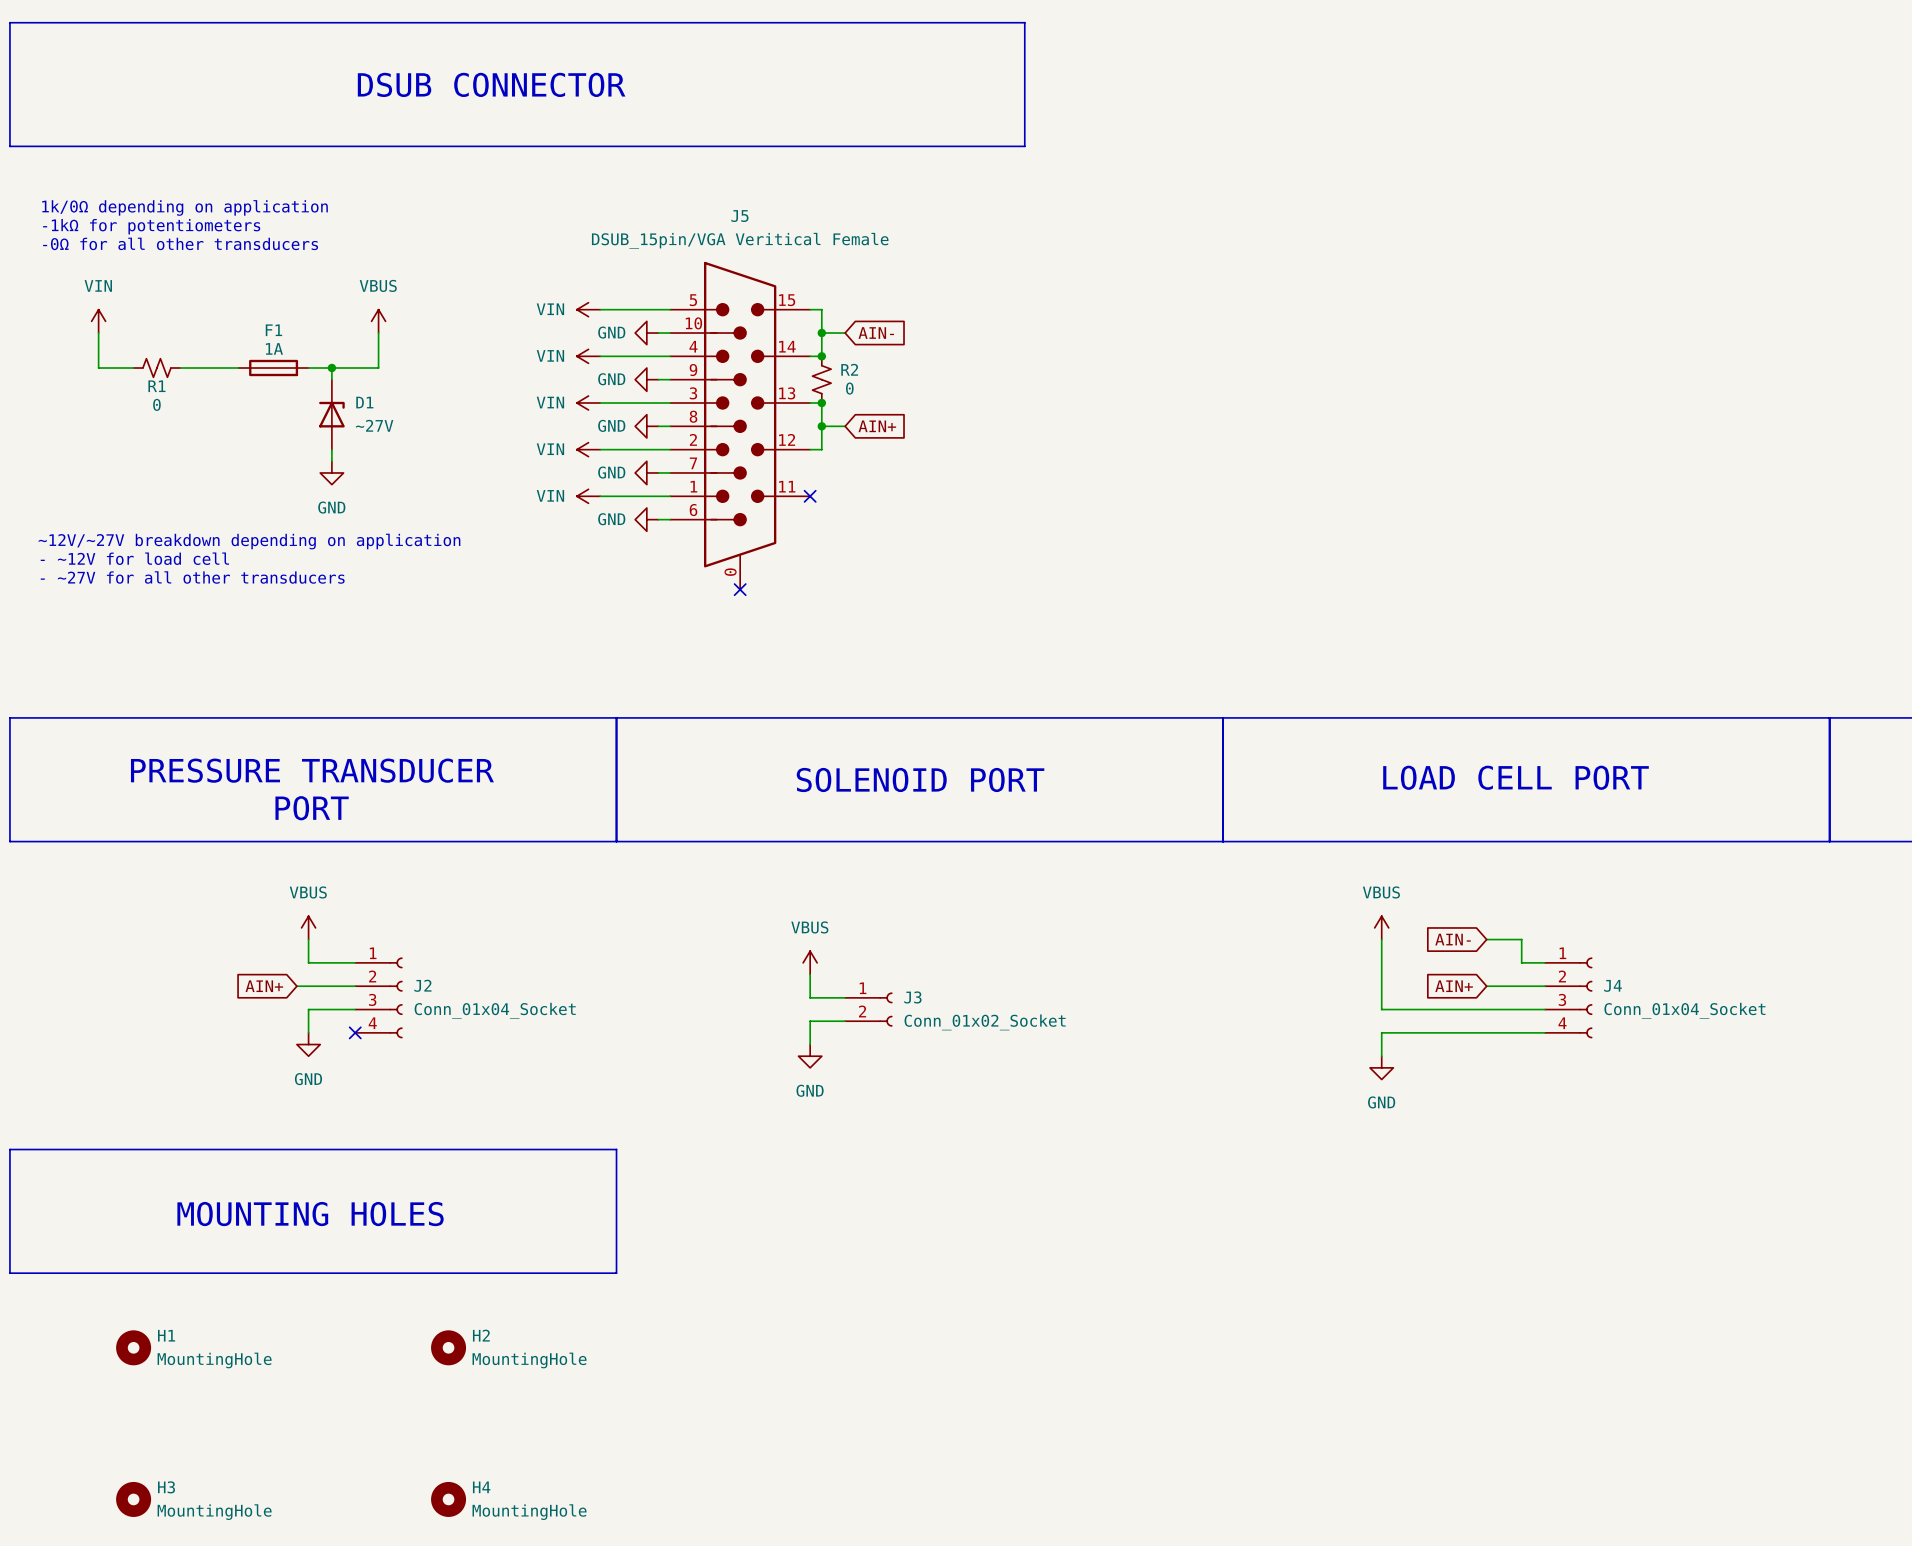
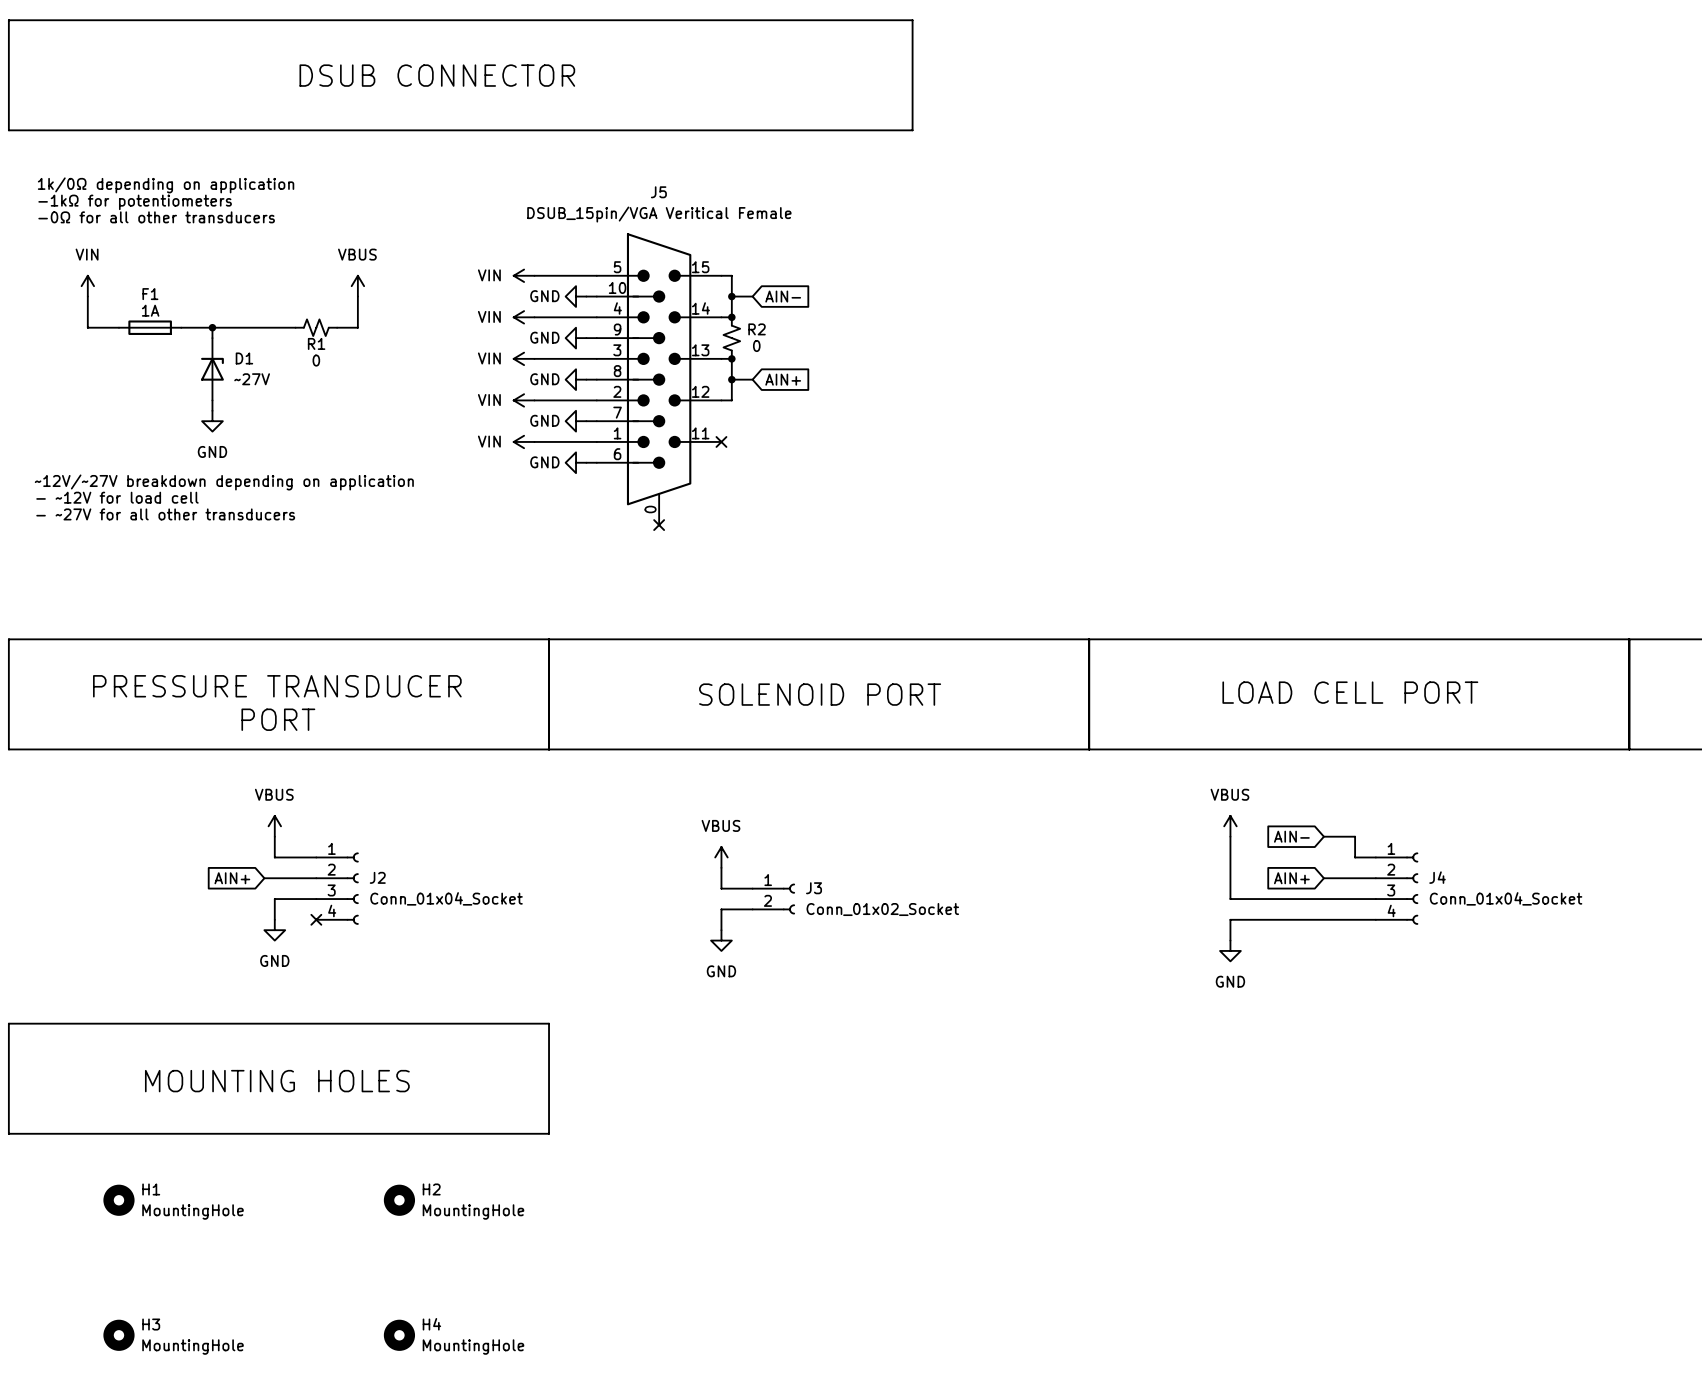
power symbol position: VBUS (378, 321) -> VBUS (357, 286)
wire: (378, 333) (378, 368) (331, 368) (331, 379) -> none
wire: none -> (357, 296) (357, 327) (337, 327)
R1 position: (156, 368) -> (316, 327)
junction: none -> (212, 327)
F1 position: (273, 368) -> (150, 327)
junction: (331, 368) -> none
D1 position: (331, 414) -> (212, 369)
wire: (331, 449) (331, 461) -> (212, 400) (212, 410)
power symbol position: GND (331, 472) -> GND (212, 421)

